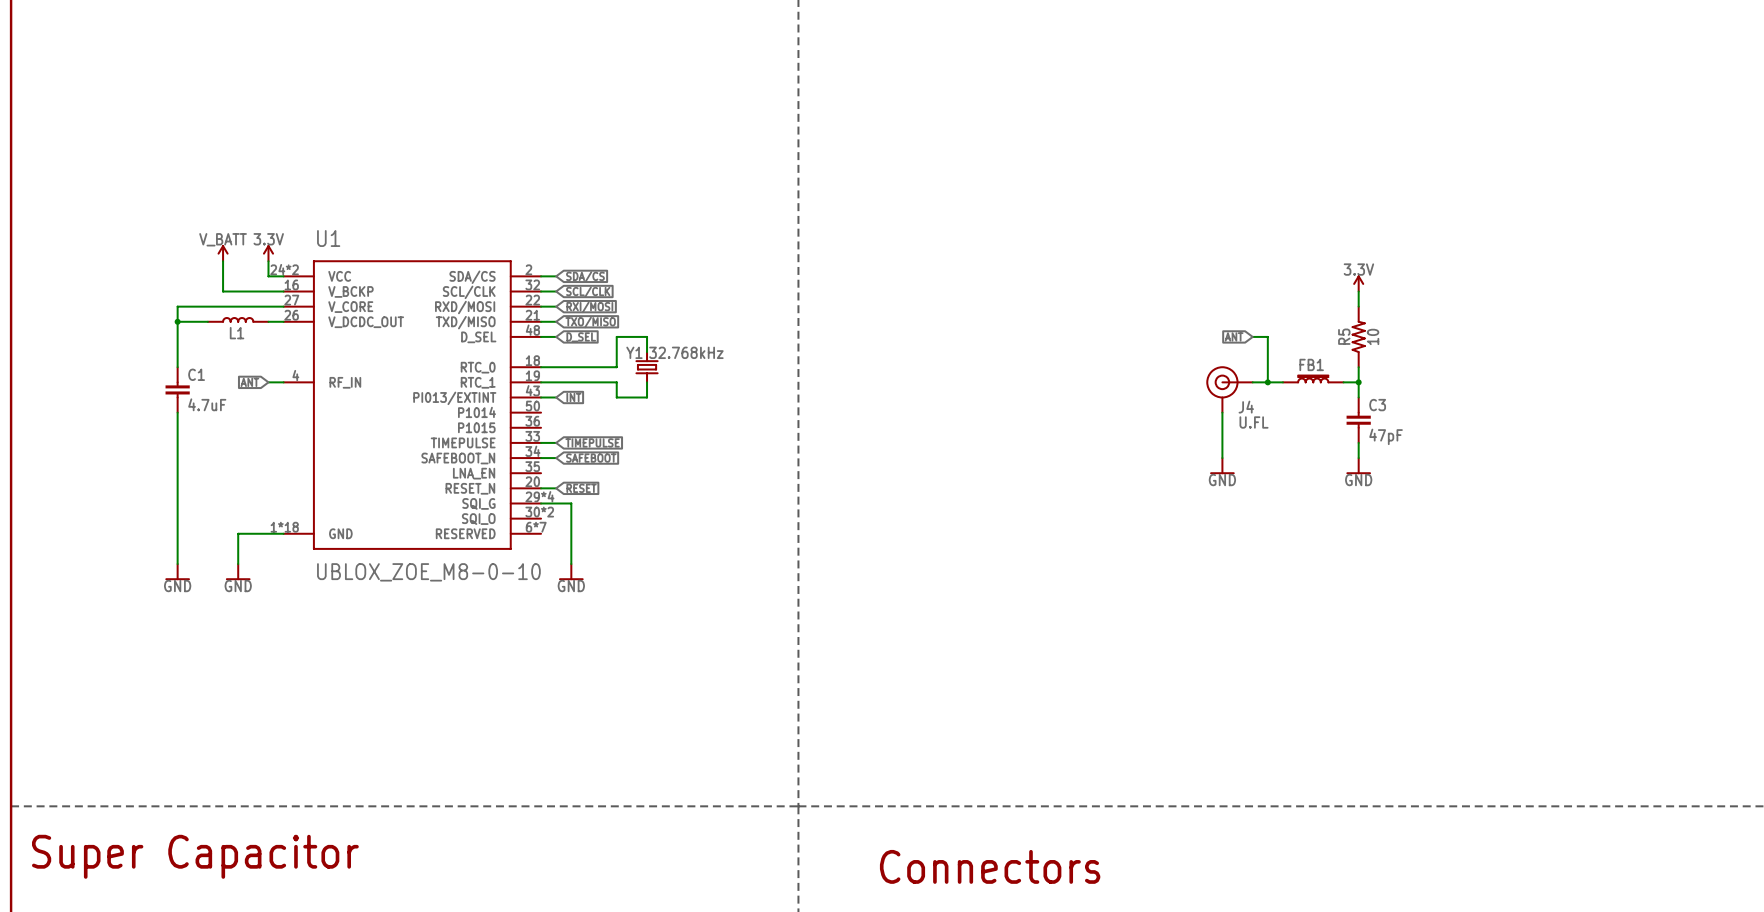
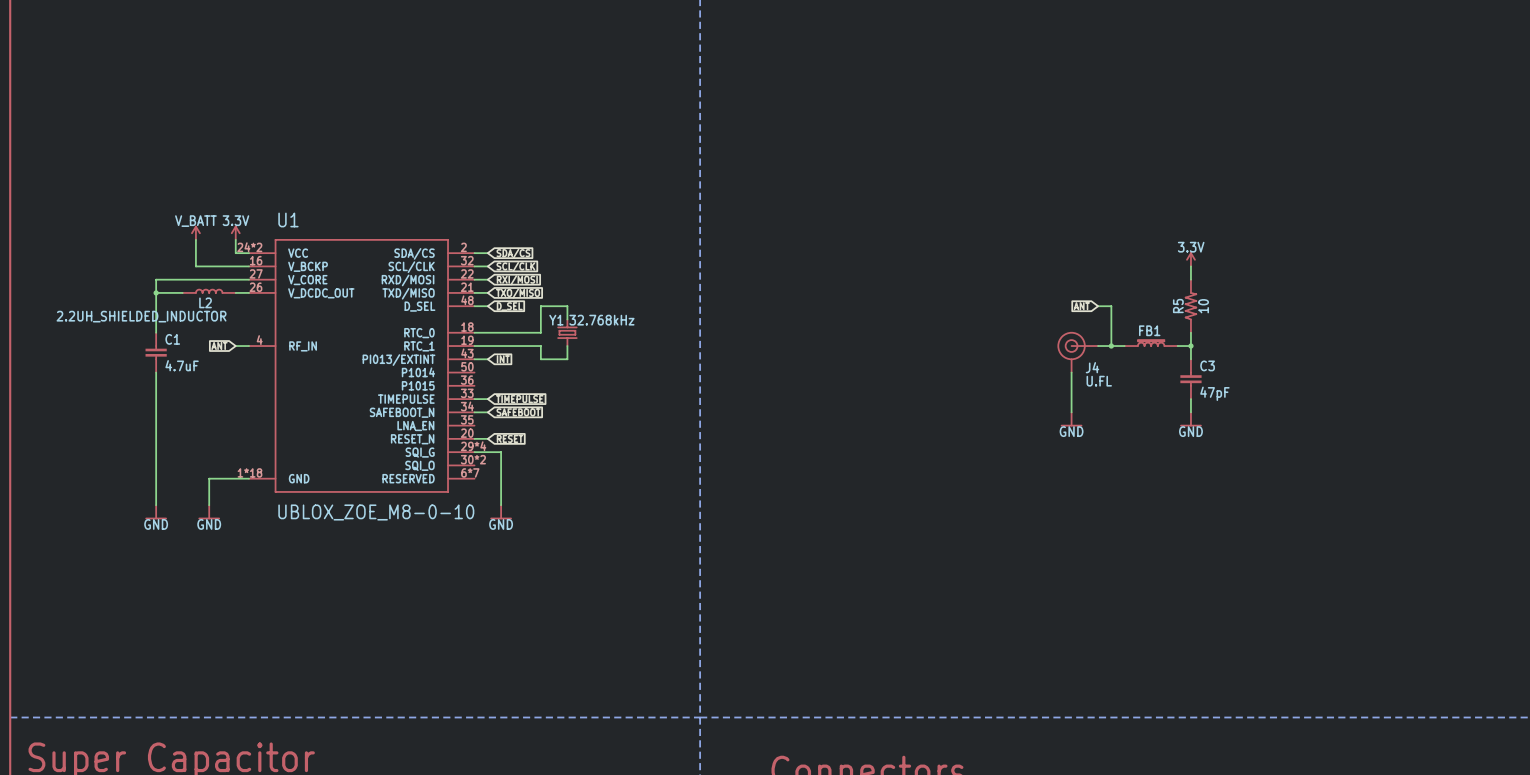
L1 name: L1 (237, 333) -> L2 (205, 302)
L1 value: none -> 2.2UH_SHIELDED_INDUCTOR (141, 316)

